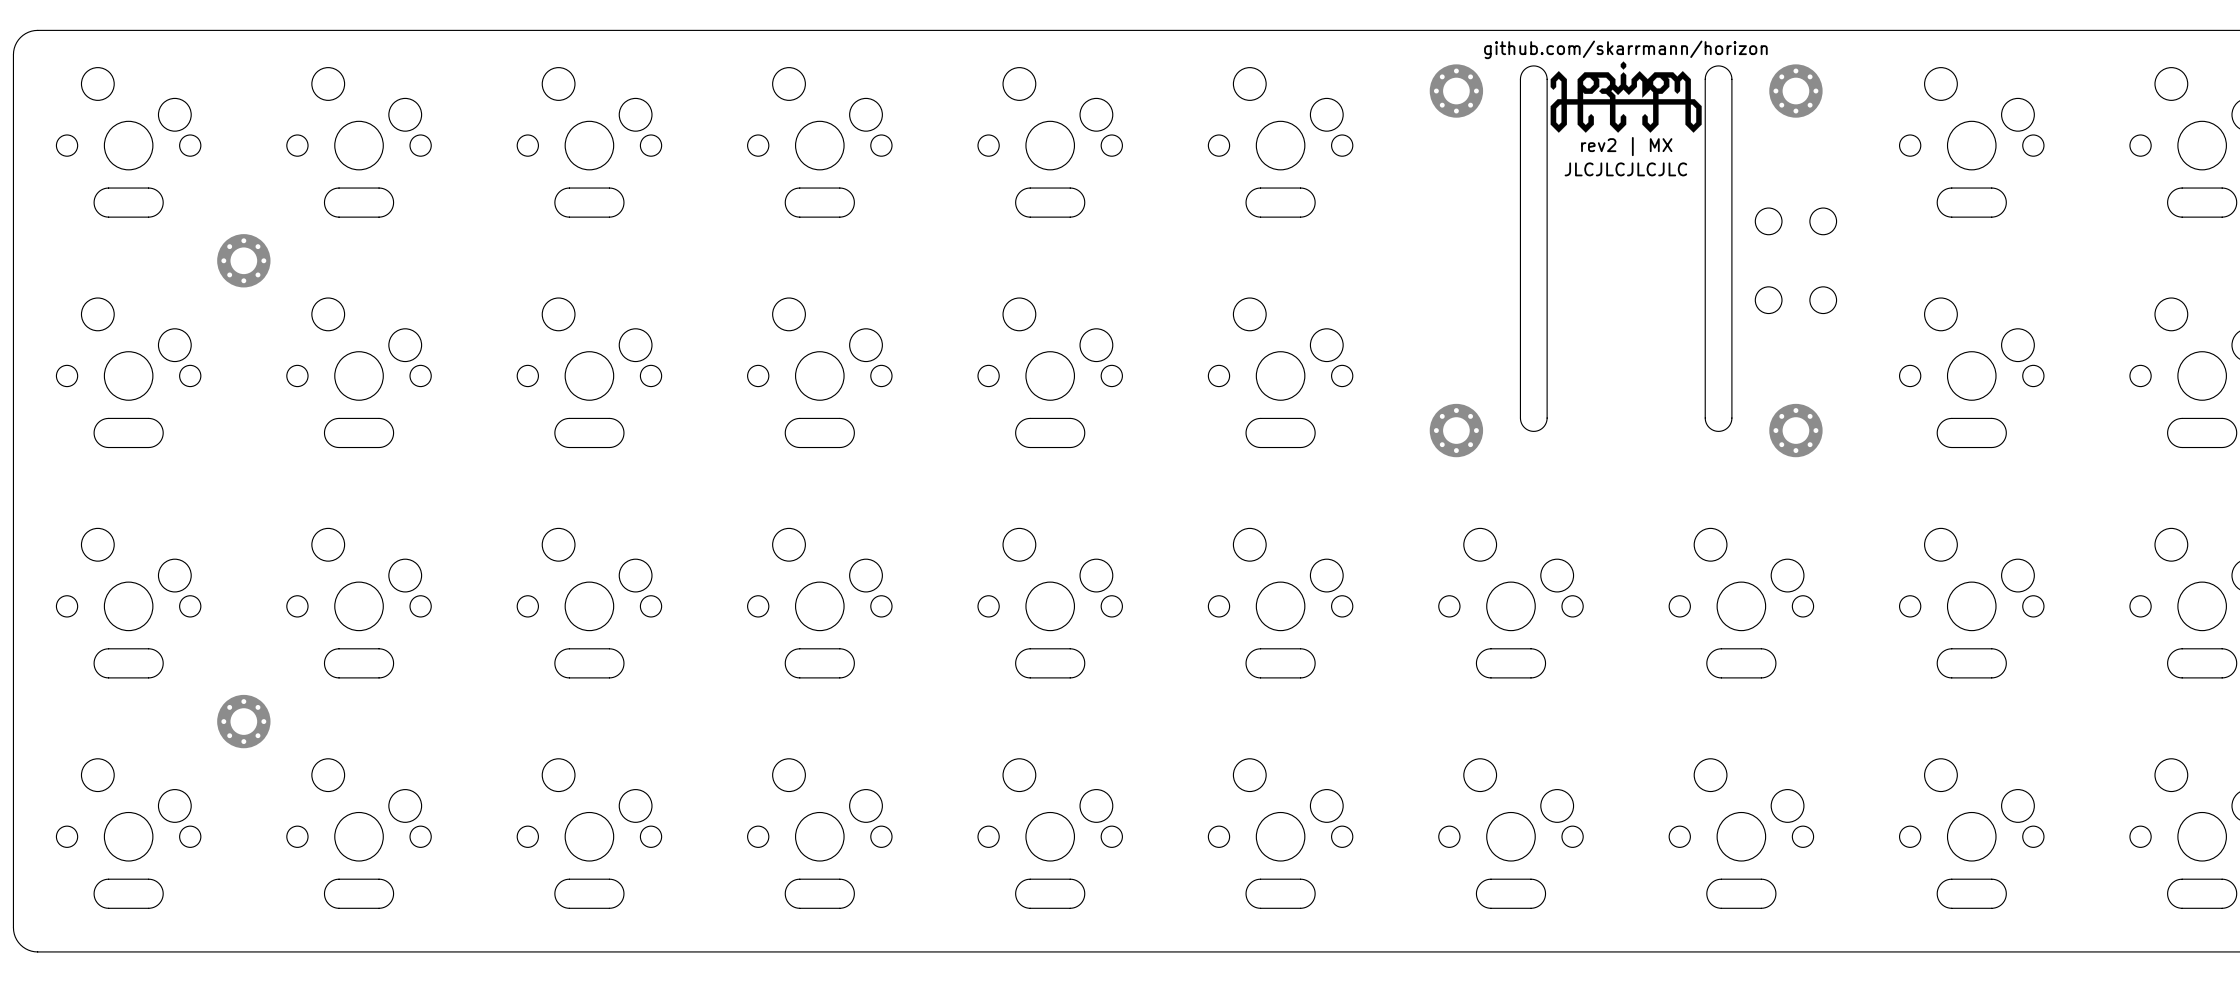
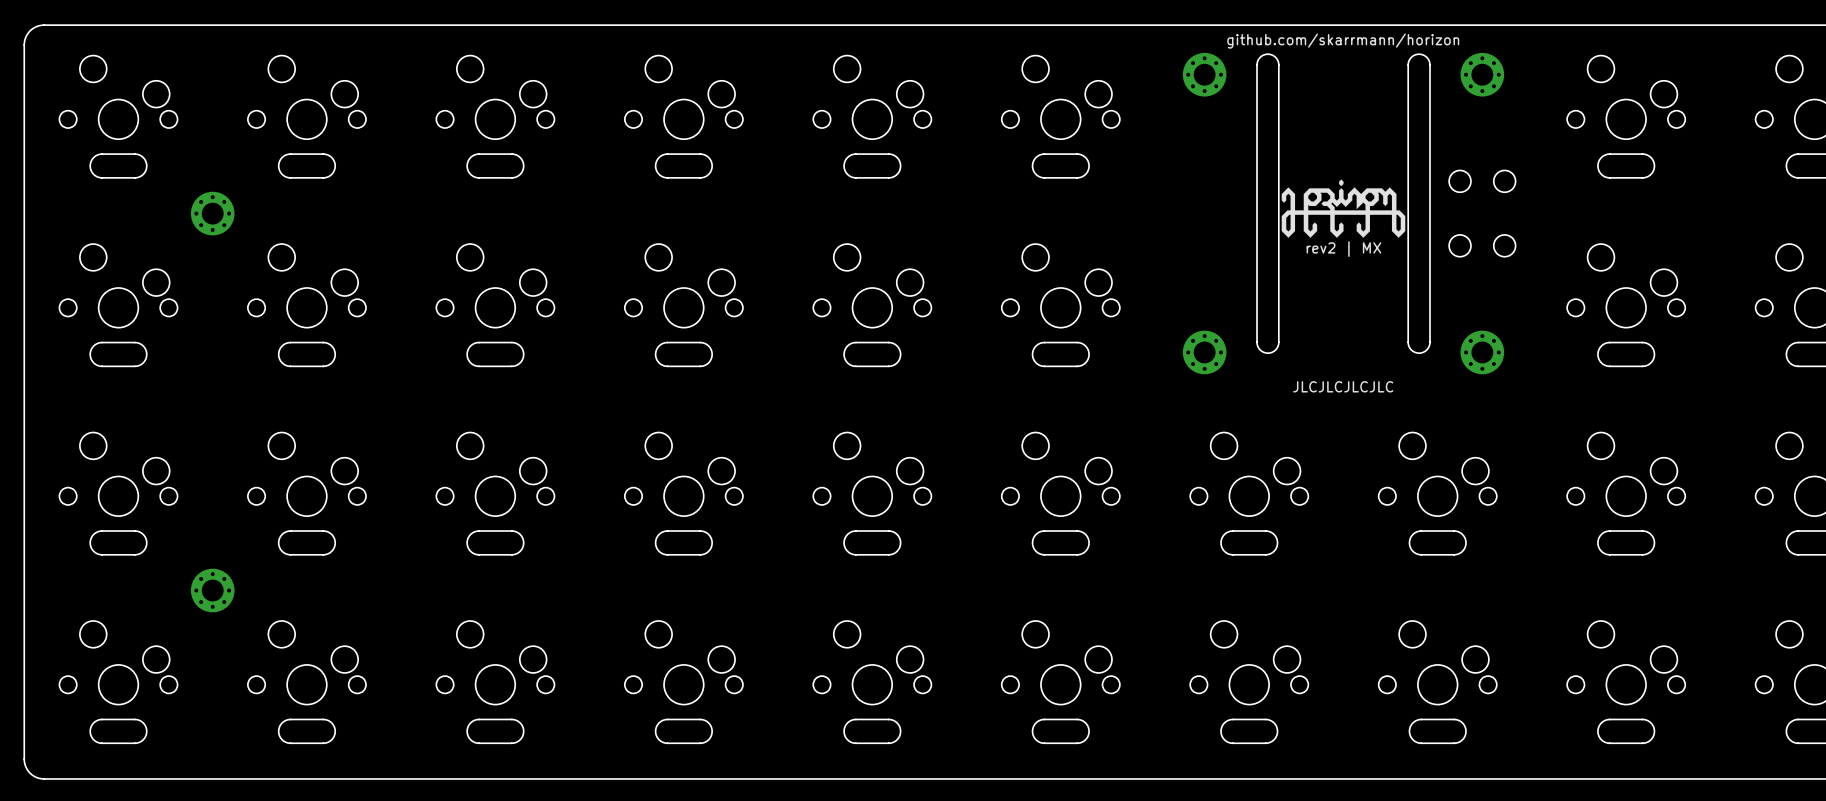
drawing position: (1626, 97) -> (1343, 208)
text position: rev2 | MX (1626, 146) -> rev2 | MX (1343, 249)
text position: JLCJLCJLCJLC (1625, 169) -> JLCJLCJLCJLC (1343, 386)

